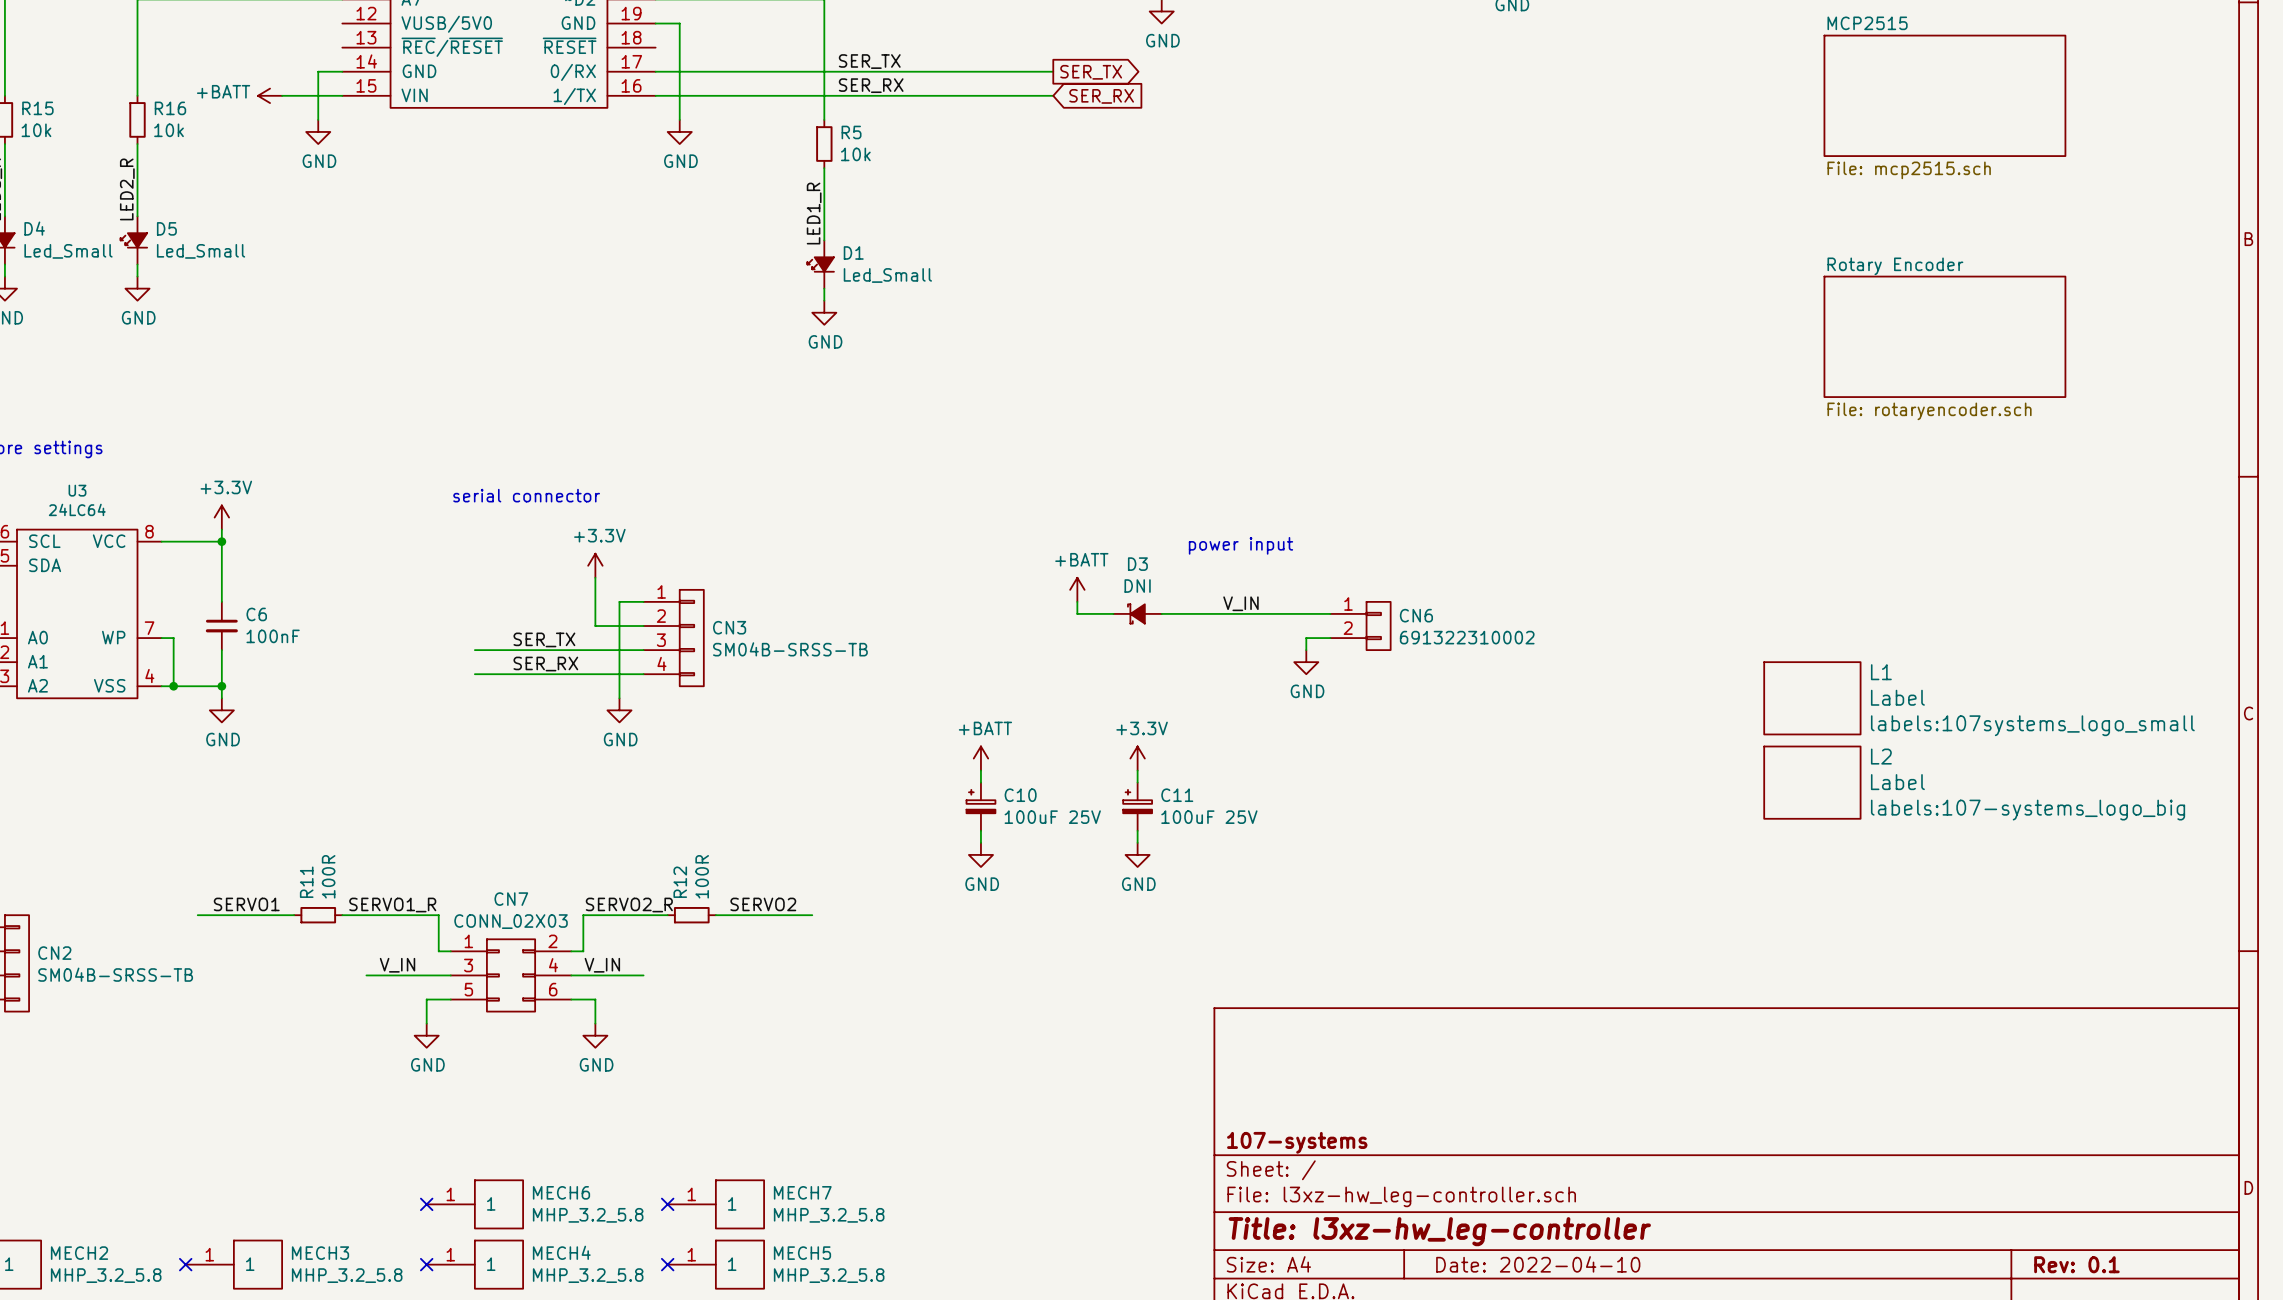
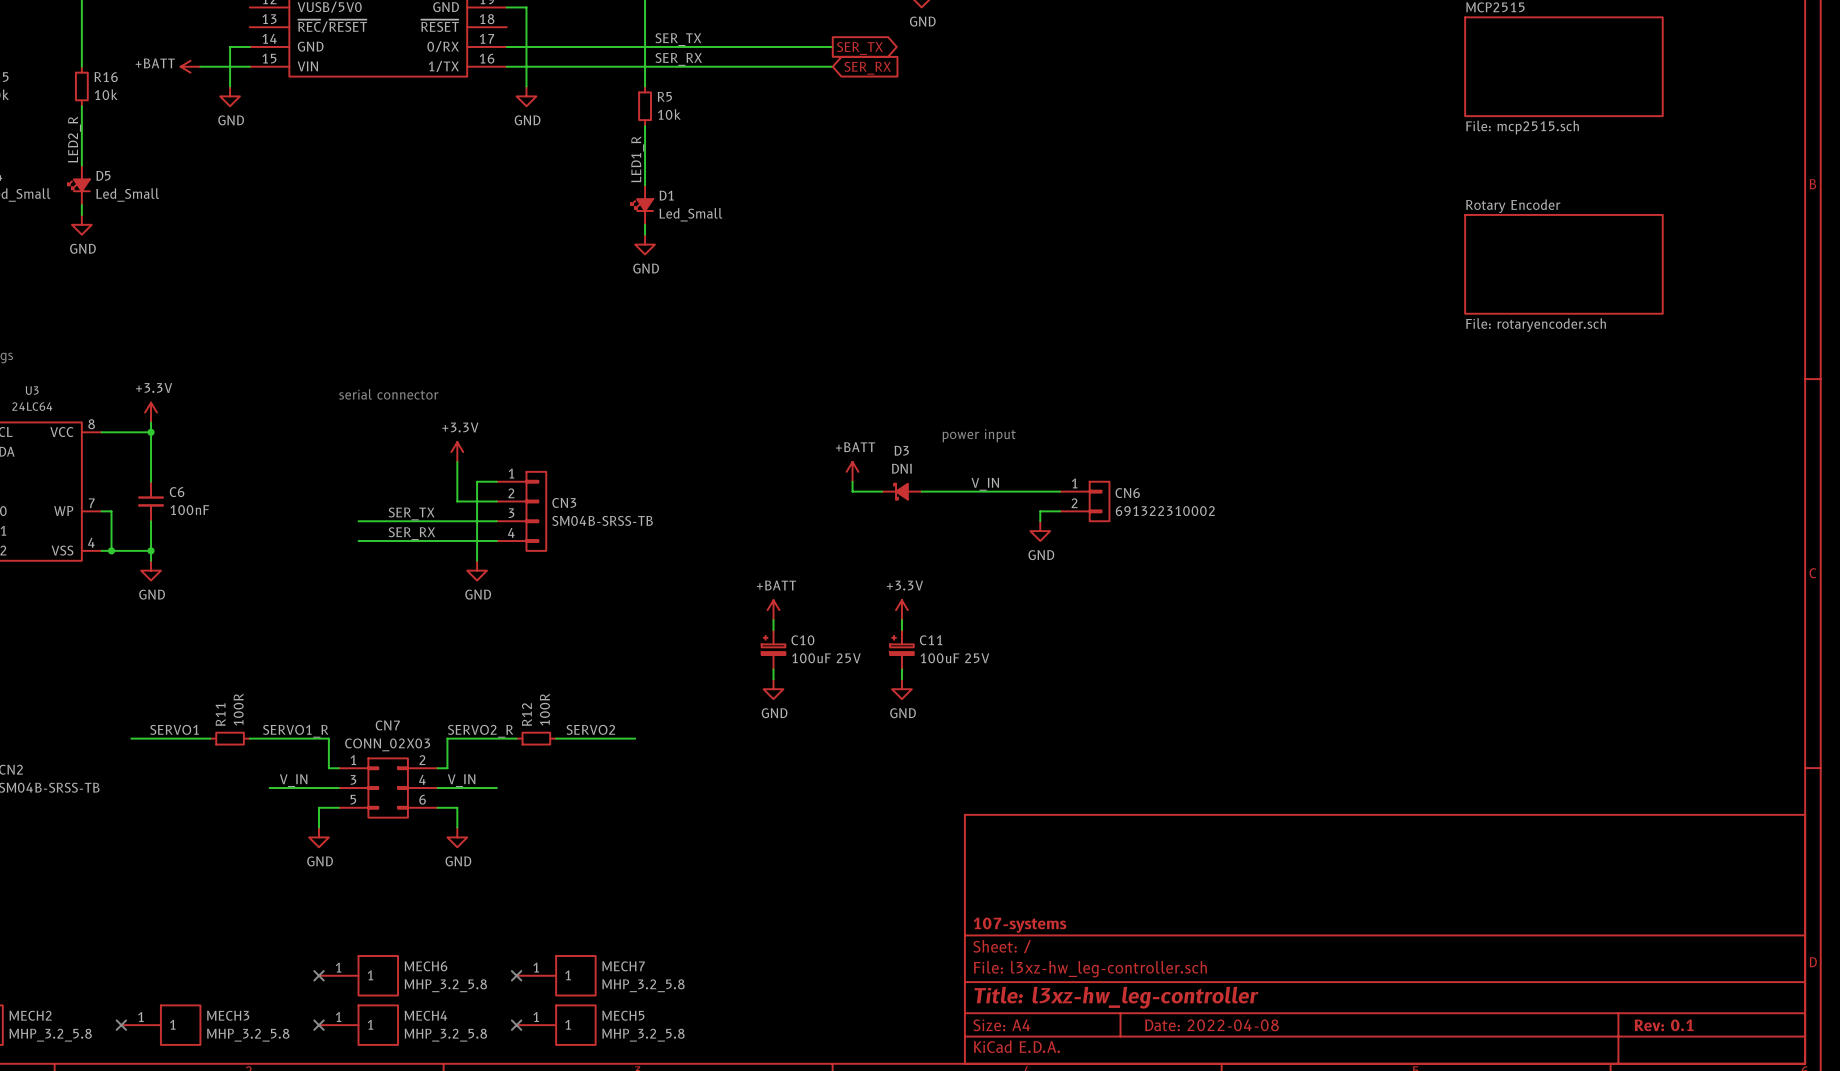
L1: Label (1812, 698) -> none
L2: Label (1812, 782) -> none
title block: Date: 2022-04-10 (1538, 1264) -> Date: 2022-04-08 (1211, 1025)

